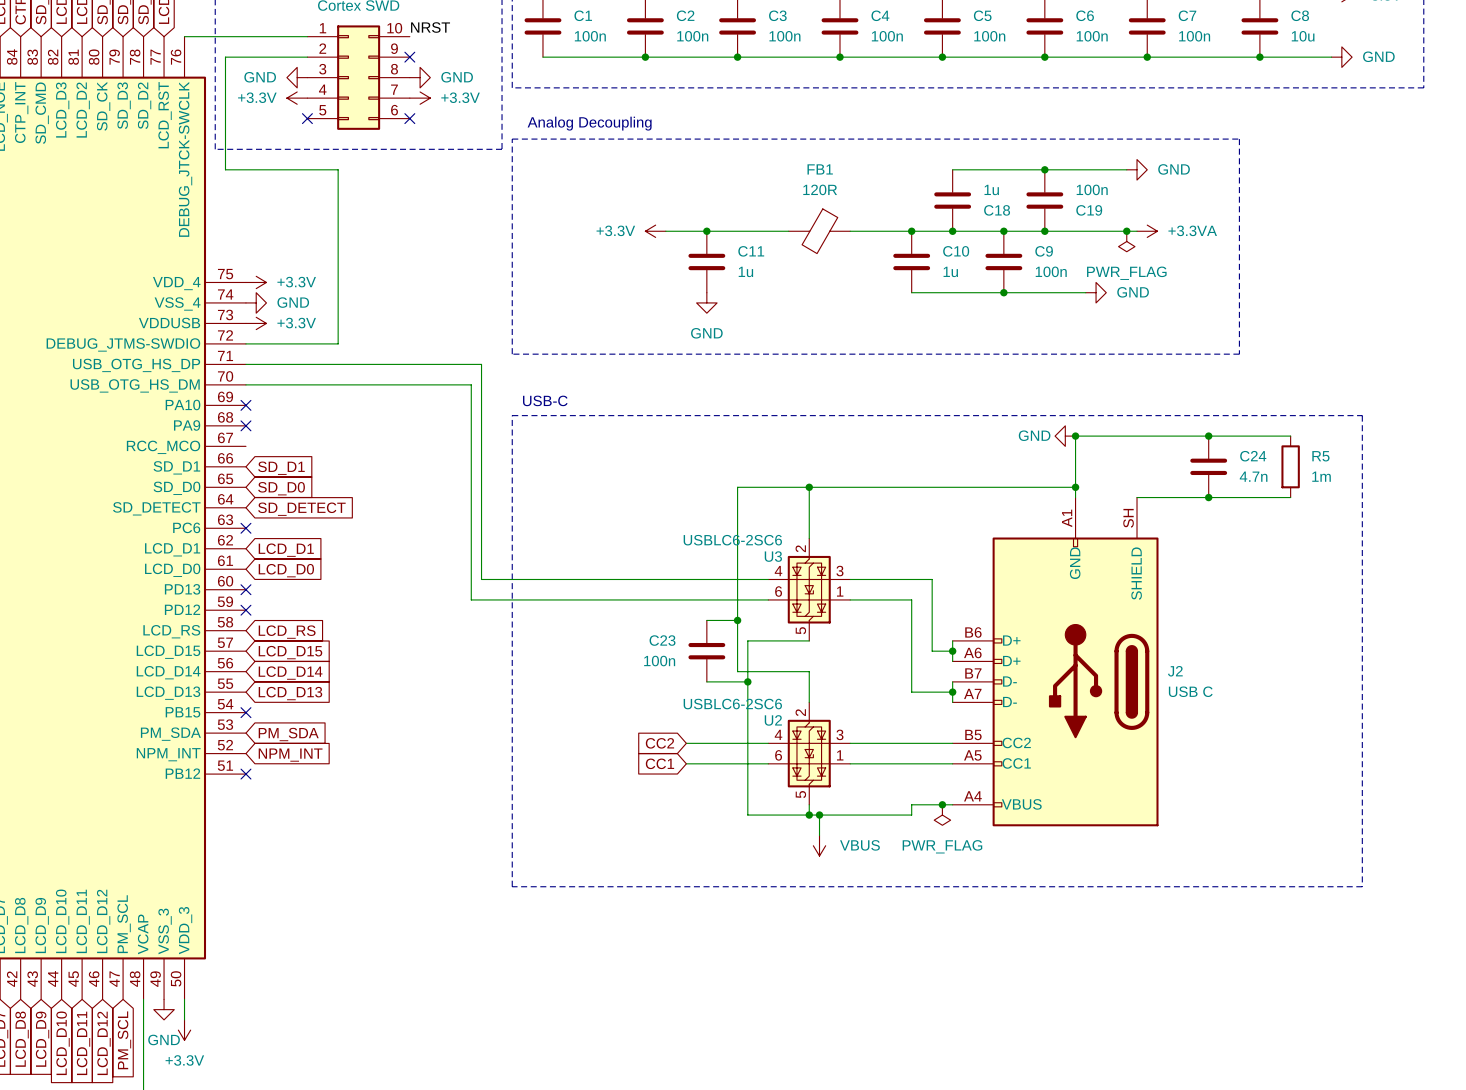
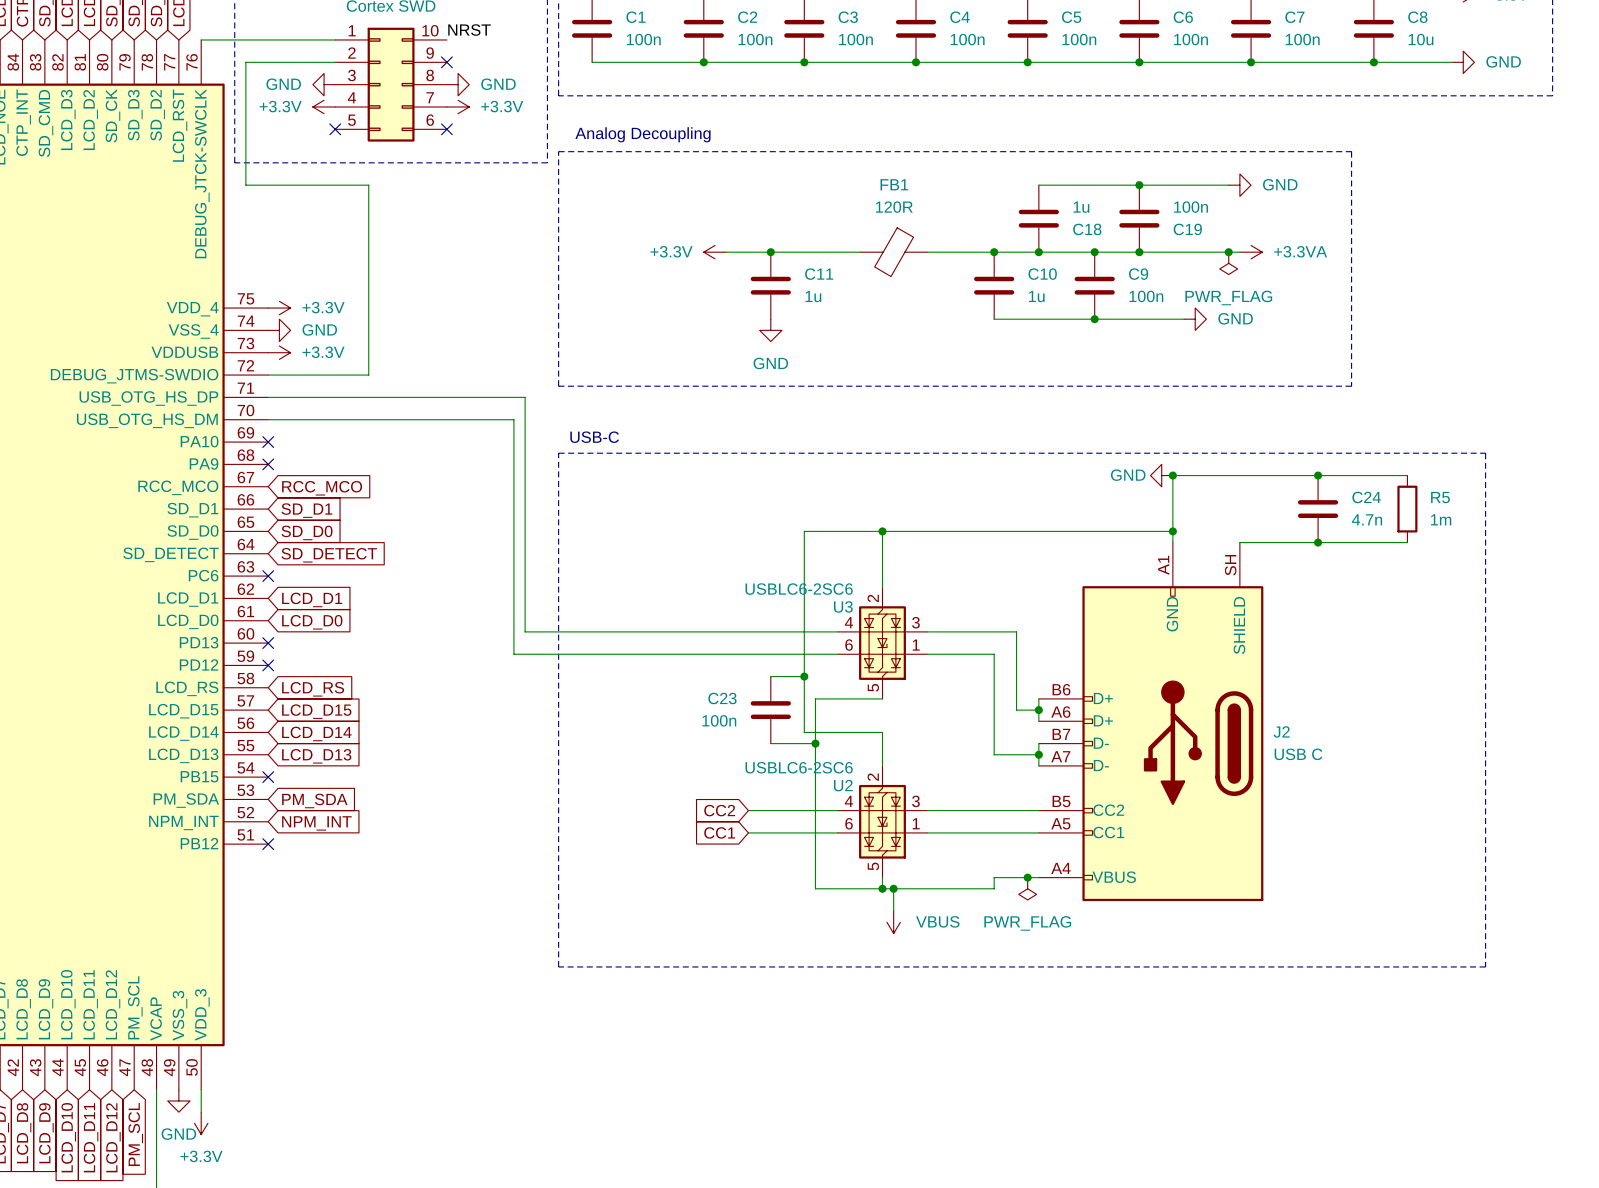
global label: none -> RCC_MCO (322, 488)

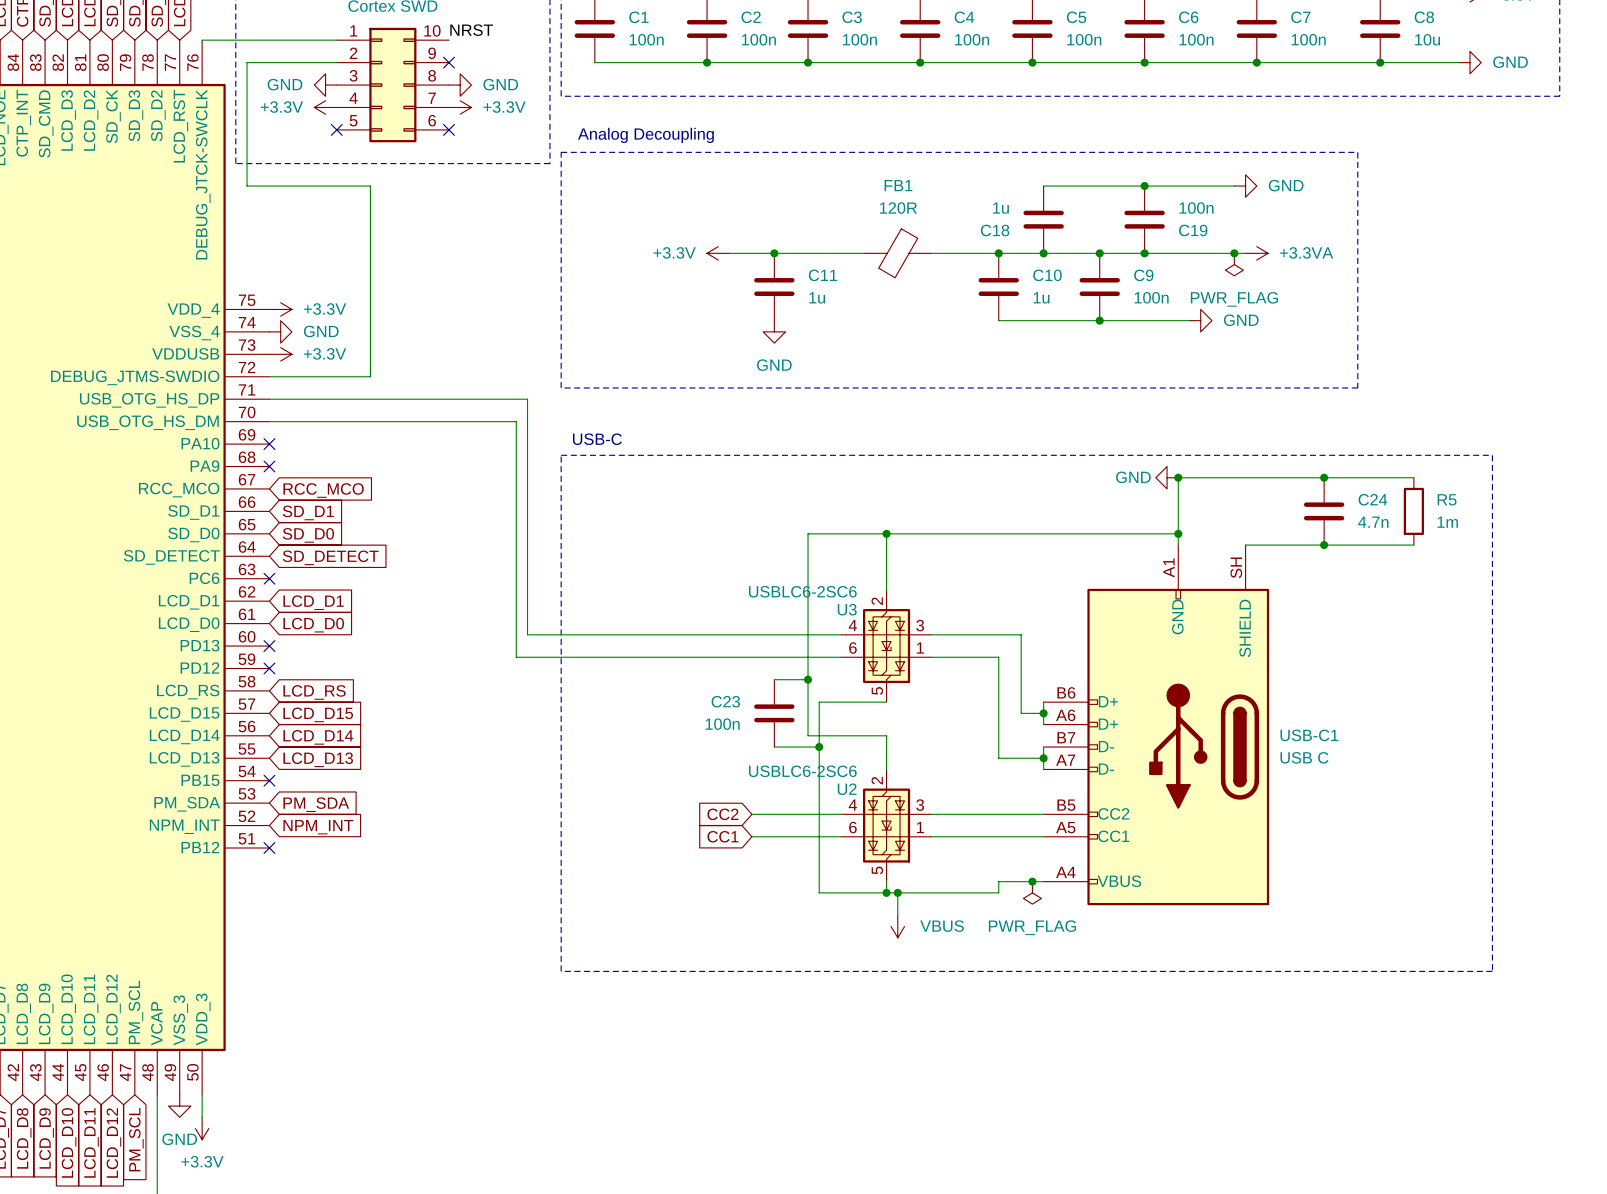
C18 value position: 1u (1081, 207) -> 1u (1000, 208)
C18 name position: C18 (1087, 229) -> C18 (995, 230)
J2 name: J2 (1281, 732) -> USB-C1 (1309, 735)

